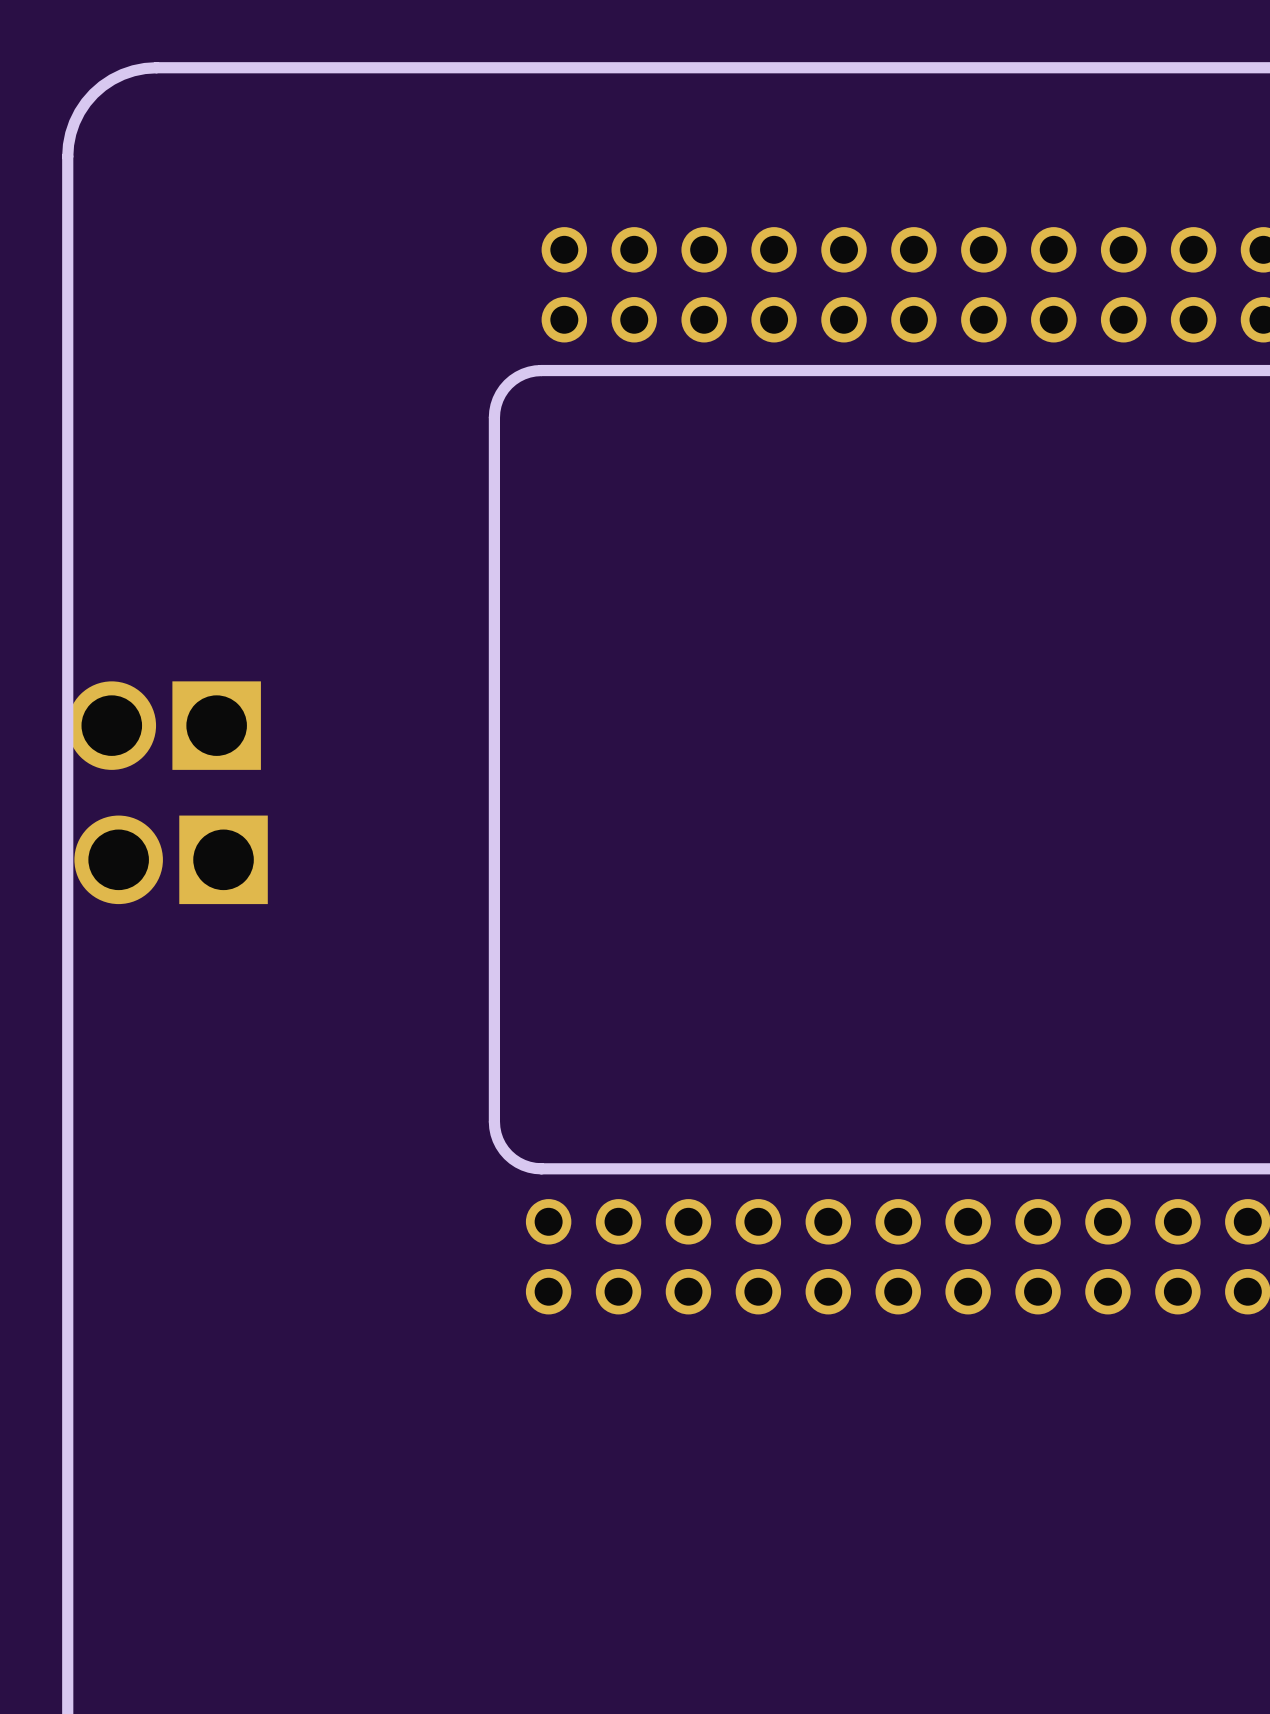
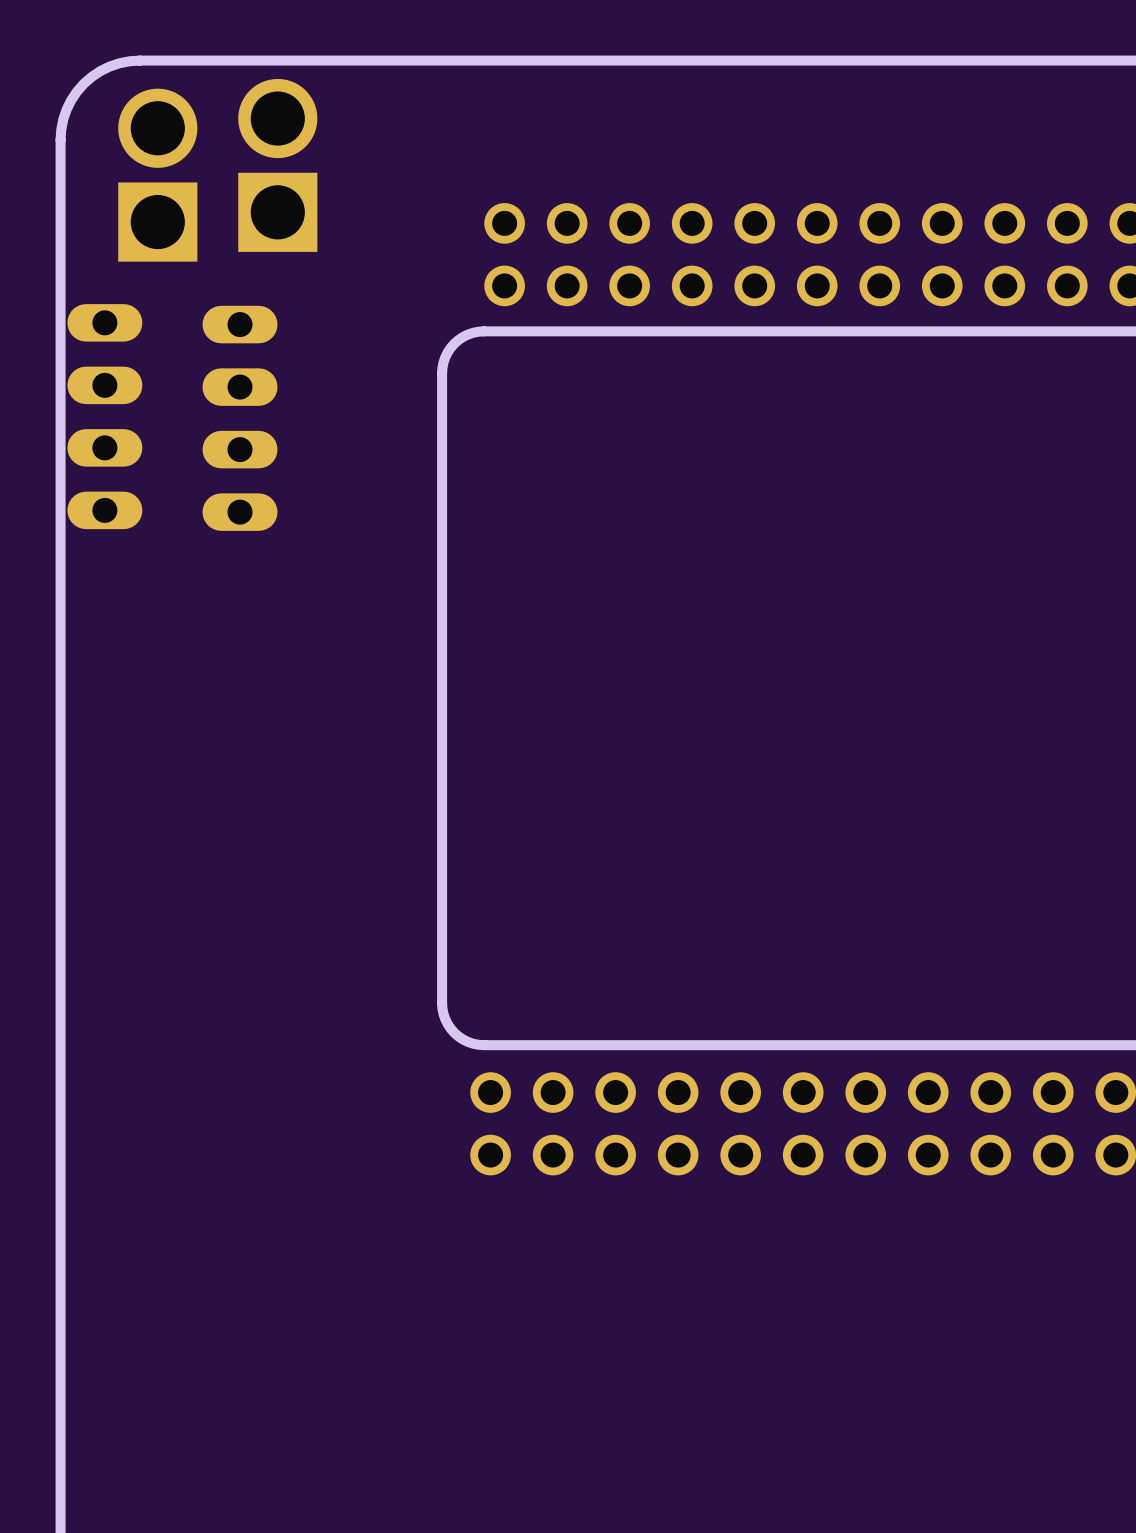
part: none -> (277, 165)
part: none -> (157, 175)
part: none -> (104, 416)
part: none -> (240, 418)
part: (164, 725) -> none
part: (171, 859) -> none

